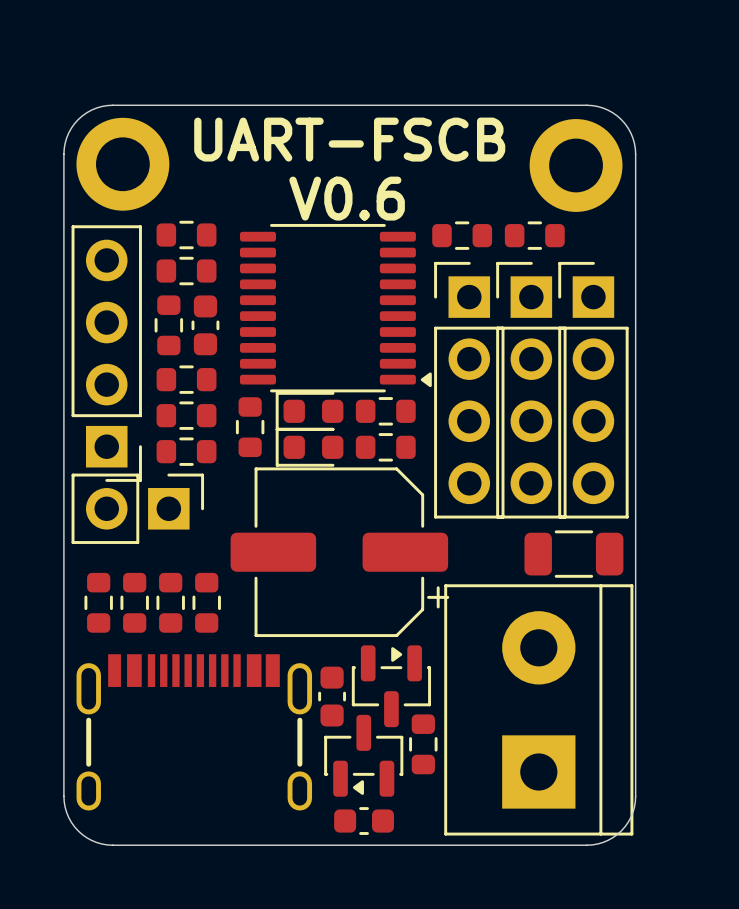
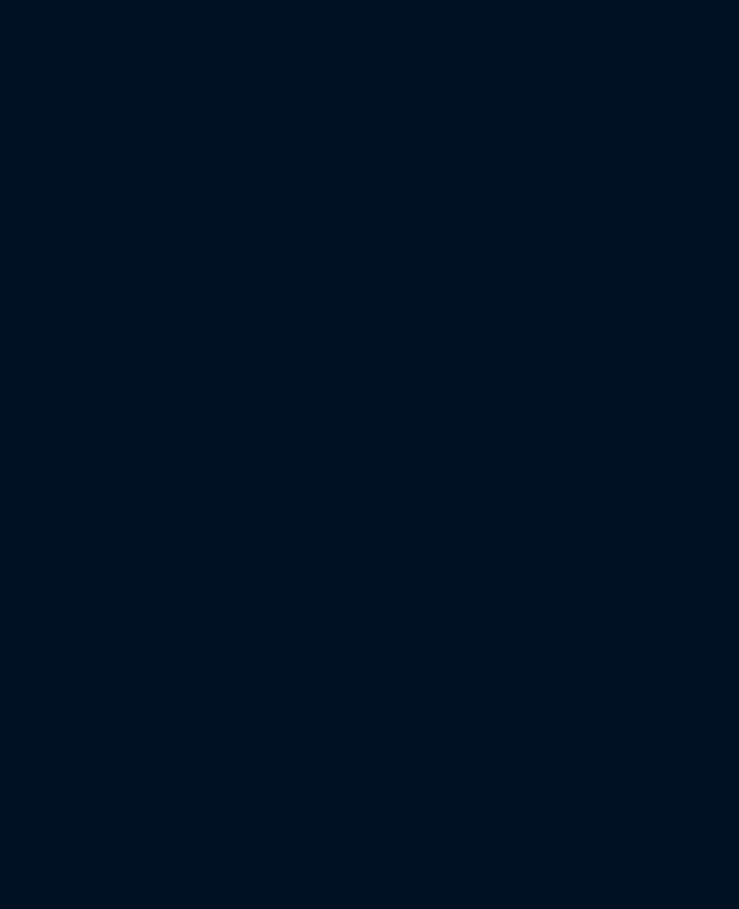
board edge: (112, 105) (586, 105) (607, 110) (621, 119) (628, 128) (634, 143) (635, 154) (635, 796) (630, 817) (624, 826) (612, 837) (602, 842) (586, 845) (112, 845) (91, 840) (82, 834) (71, 822) (66, 812) (63, 796) (64, 148) (68, 132) (78, 119) (91, 110) (112, 105) -> none
text: UART-FSCB (349, 139) -> none
part: (122, 164) -> none
part: (576, 165) -> none
text: V0.6 (347, 198) -> none
part: (186, 235) -> none
part: (462, 235) -> none
part: (534, 235) -> none
part: (186, 271) -> none
part: (335, 308) -> none
part: (168, 325) -> none
part: (205, 325) -> none
part: (106, 353) -> none
part: (186, 379) -> none
part: (469, 390) -> none
part: (531, 390) -> none
part: (593, 390) -> none
part: (309, 411) -> none
part: (385, 411) -> none
part: (186, 415) -> none
part: (250, 427) -> none
part: (309, 447) -> none
part: (385, 447) -> none
part: (186, 451) -> none
part: (137, 508) -> none
part: (339, 552) -> none
part: (573, 554) -> none
part: (98, 602) -> none
part: (134, 602) -> none
part: (170, 602) -> none
part: (206, 602) -> none
part: (391, 686) -> none
part: (332, 696) -> none
part: (538, 709) -> none
part: (194, 732) -> none
part: (423, 744) -> none
part: (363, 755) -> none
part: (364, 821) -> none

